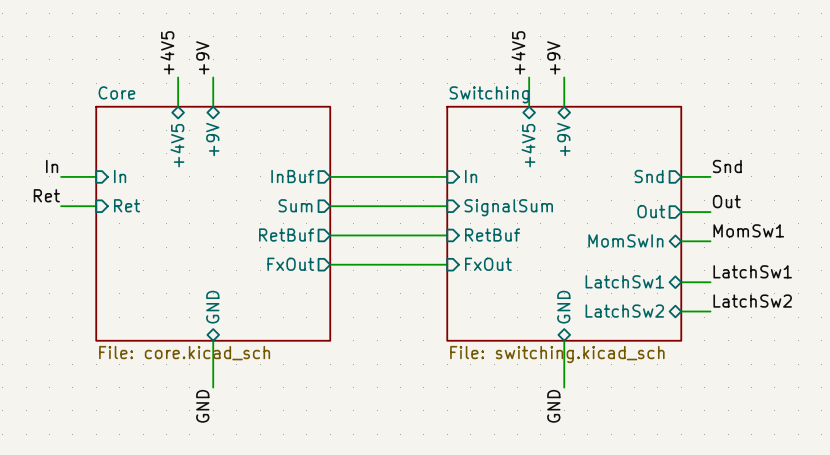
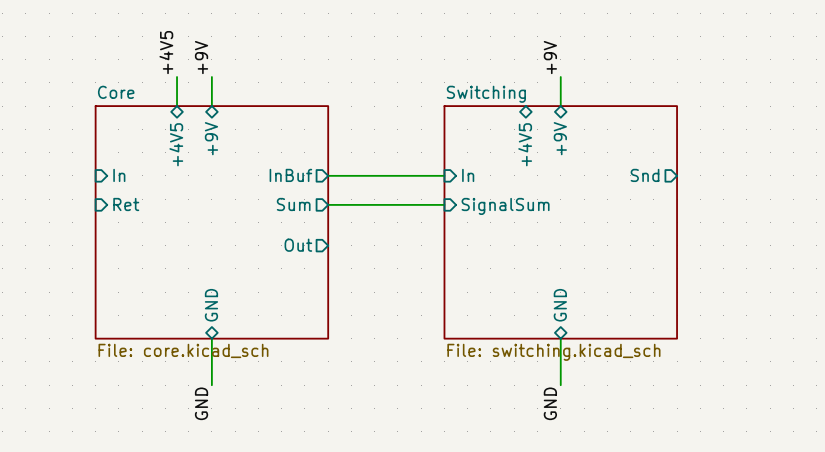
label: +4V5 (518, 52) -> none
wire: (529, 77) (529, 106) -> none
label: In (52, 166) -> none
label: Snd (727, 166) -> none
wire: (61, 176) (96, 176) -> none
wire: (681, 176) (710, 176) -> none
label: Ret (46, 195) -> none
label: Out (726, 201) -> none
wire: (61, 206) (96, 206) -> none
sheet pin: Out (651, 211) -> none
wire: (681, 212) (710, 212) -> none
label: MomSw1 (748, 230) -> none
sheet pin: RetBuf (286, 235) -> none
wire: (330, 235) (447, 235) -> none
sheet pin: RetBuf (492, 235) -> none
sheet pin: MomSwIn (625, 240) -> none
wire: (681, 241) (710, 241) -> none
sheet pin: FxOut (290, 264) -> Out (298, 245)
wire: (330, 264) (447, 264) -> none
sheet pin: FxOut (488, 264) -> none
label: LatchSw1 (752, 271) -> none
sheet pin: LatchSw1 (624, 281) -> none
wire: (681, 282) (710, 282) -> none
label: LatchSw2 (752, 301) -> none
sheet pin: LatchSw2 (624, 311) -> none
wire: (681, 311) (710, 311) -> none

